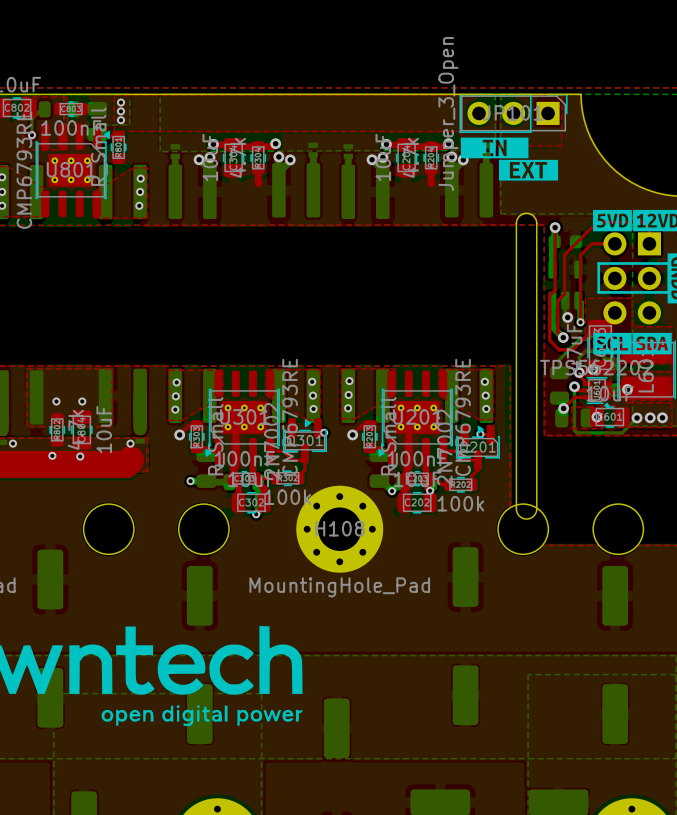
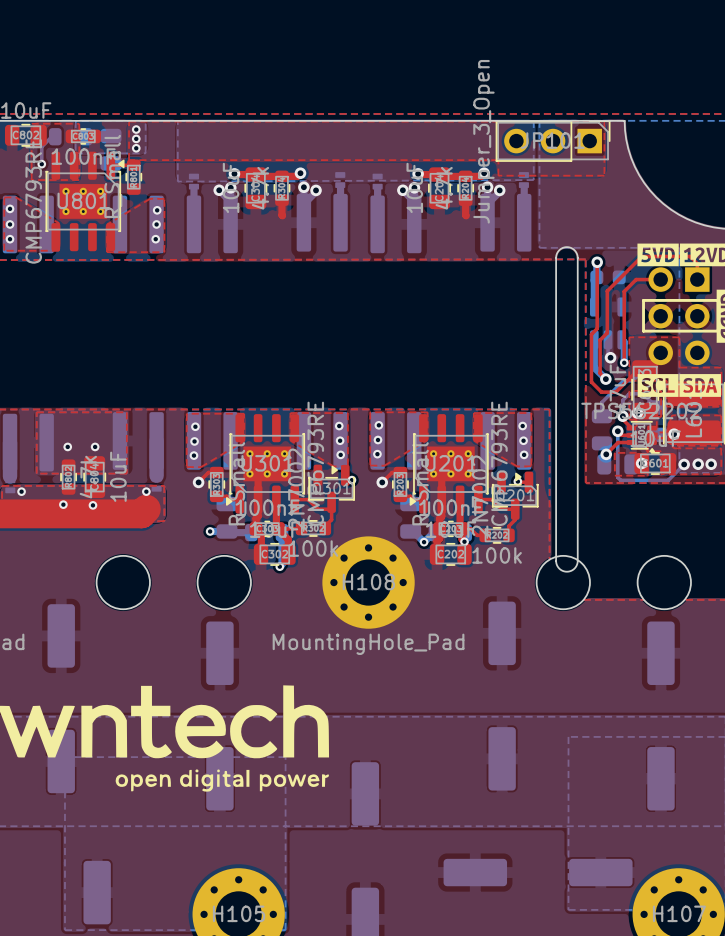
drawing: [460, 137, 559, 181] -> none

